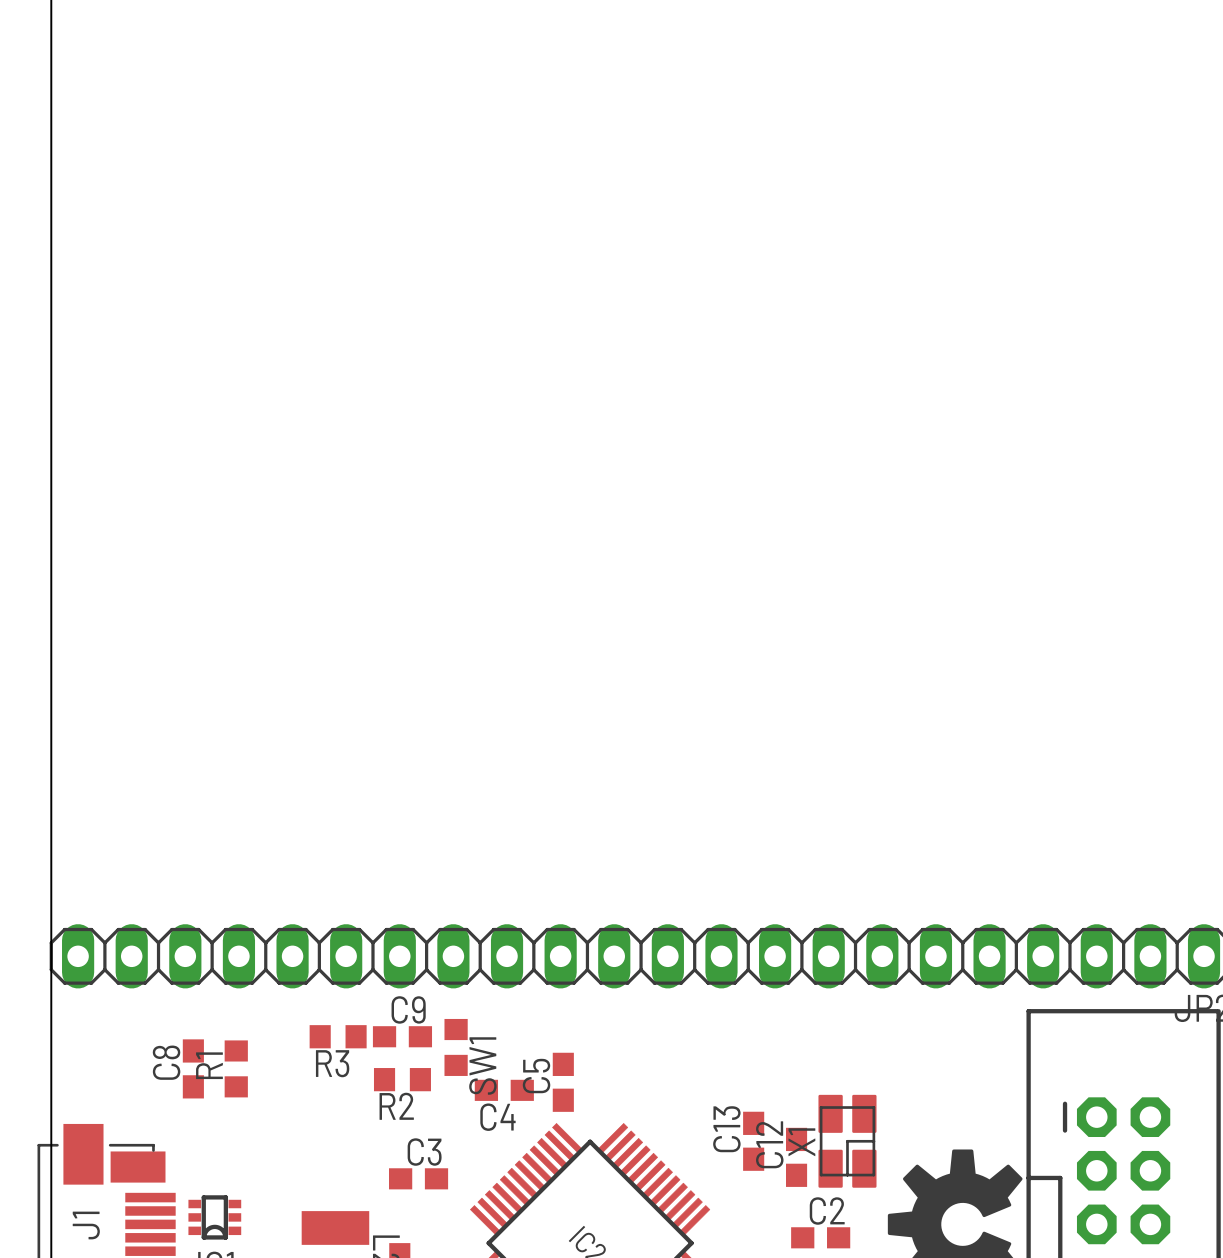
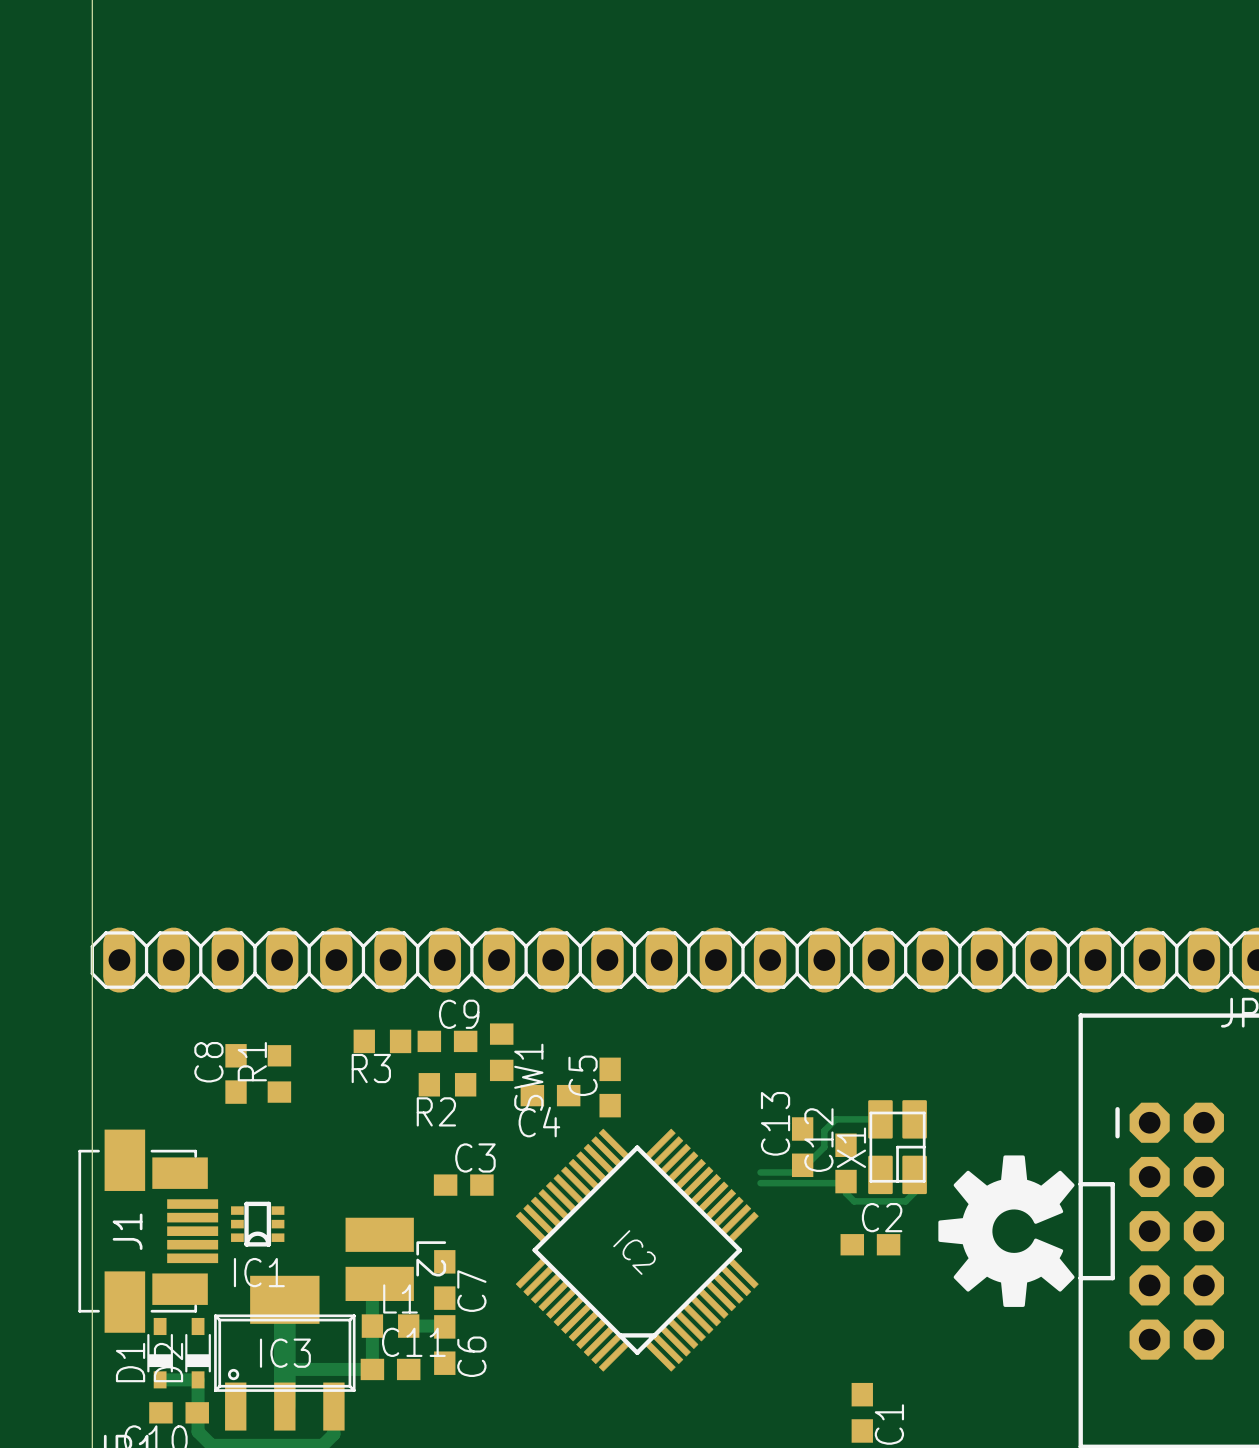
track: none -> (880, 1119) (835, 1119) (824, 1130) (824, 1147) (806, 1165) (802, 1165) (795, 1172) (760, 1172)
track: none -> (914, 1174) (914, 1192) (905, 1201) (854, 1201) (846, 1193) (846, 1181) (844, 1183) (760, 1183)

